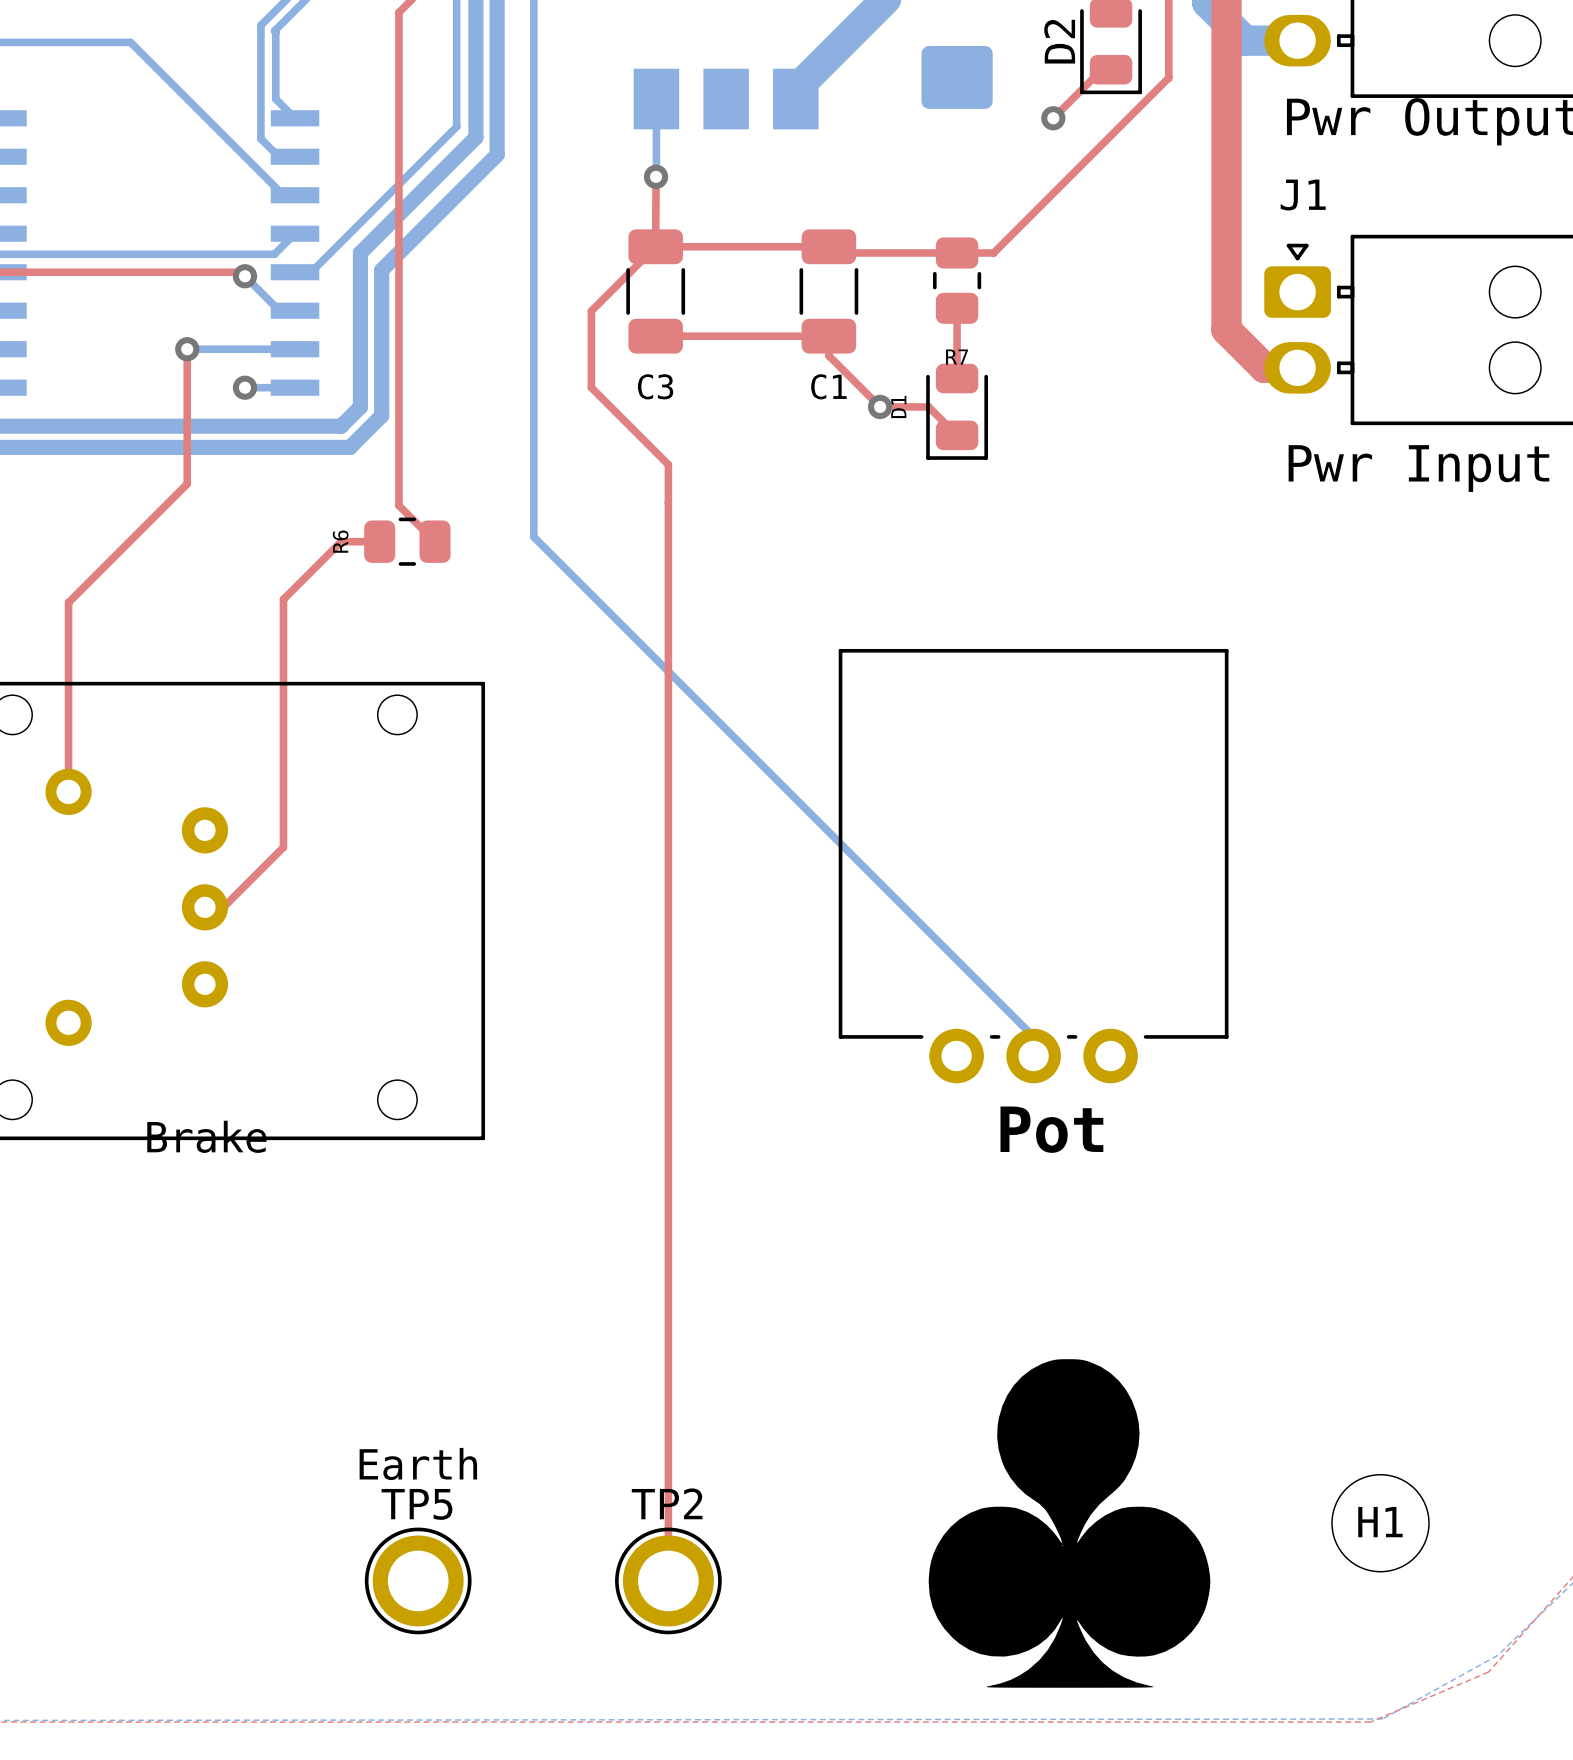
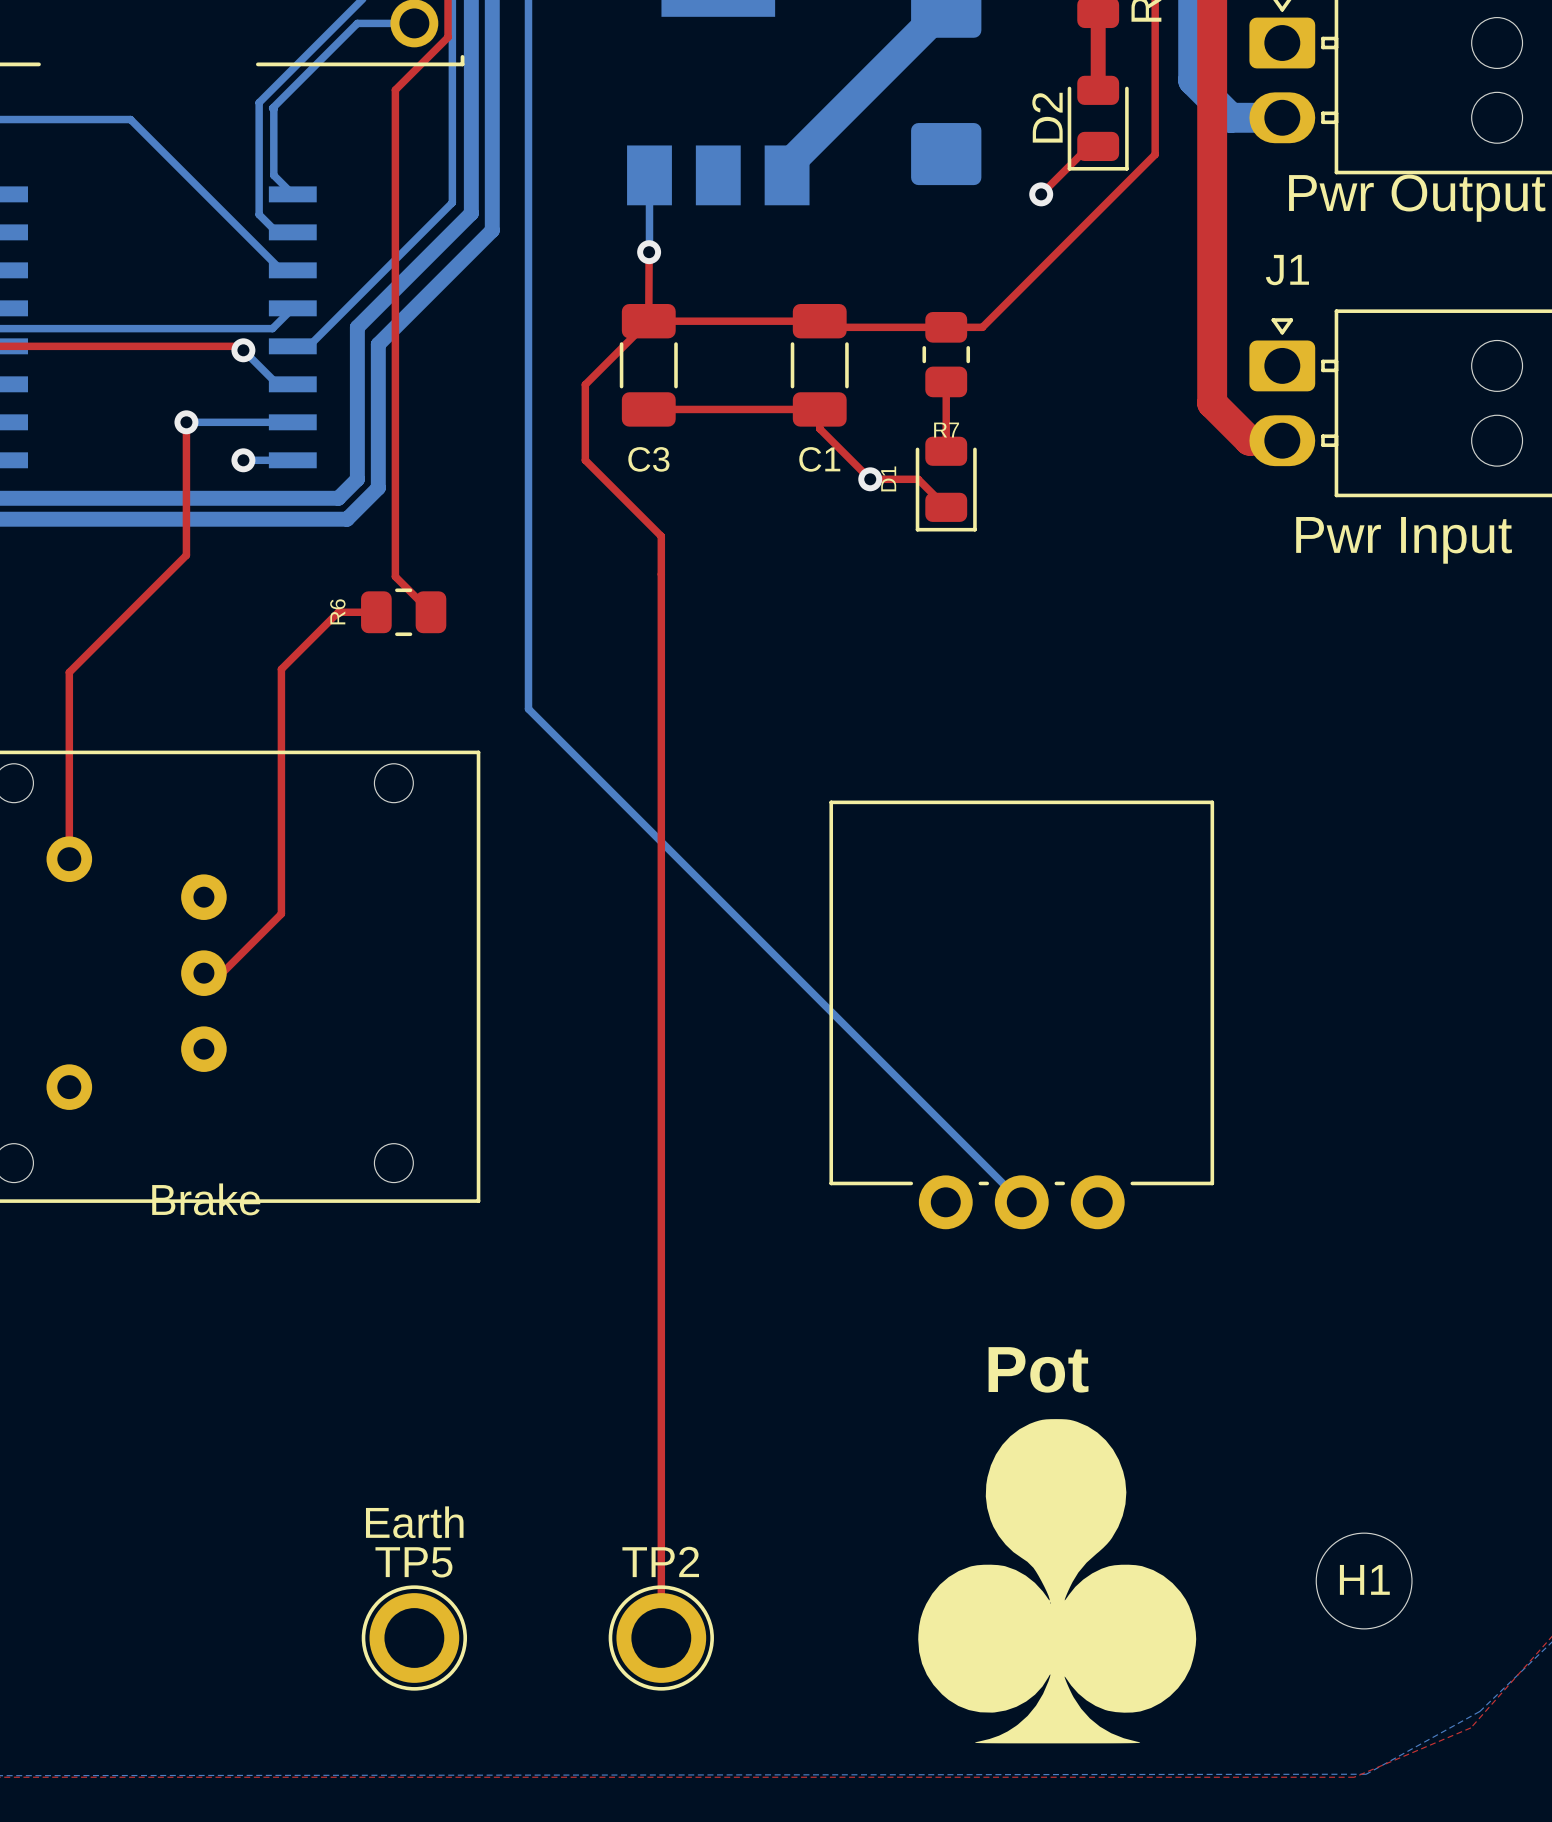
bottom track: (533, 536) (1033, 1036) -> (528, 607) (528, 709) (1021, 1202)
part position: (1033, 866) -> (1021, 1014)
text position: Pot (1051, 1129) -> Pot (1038, 1369)

